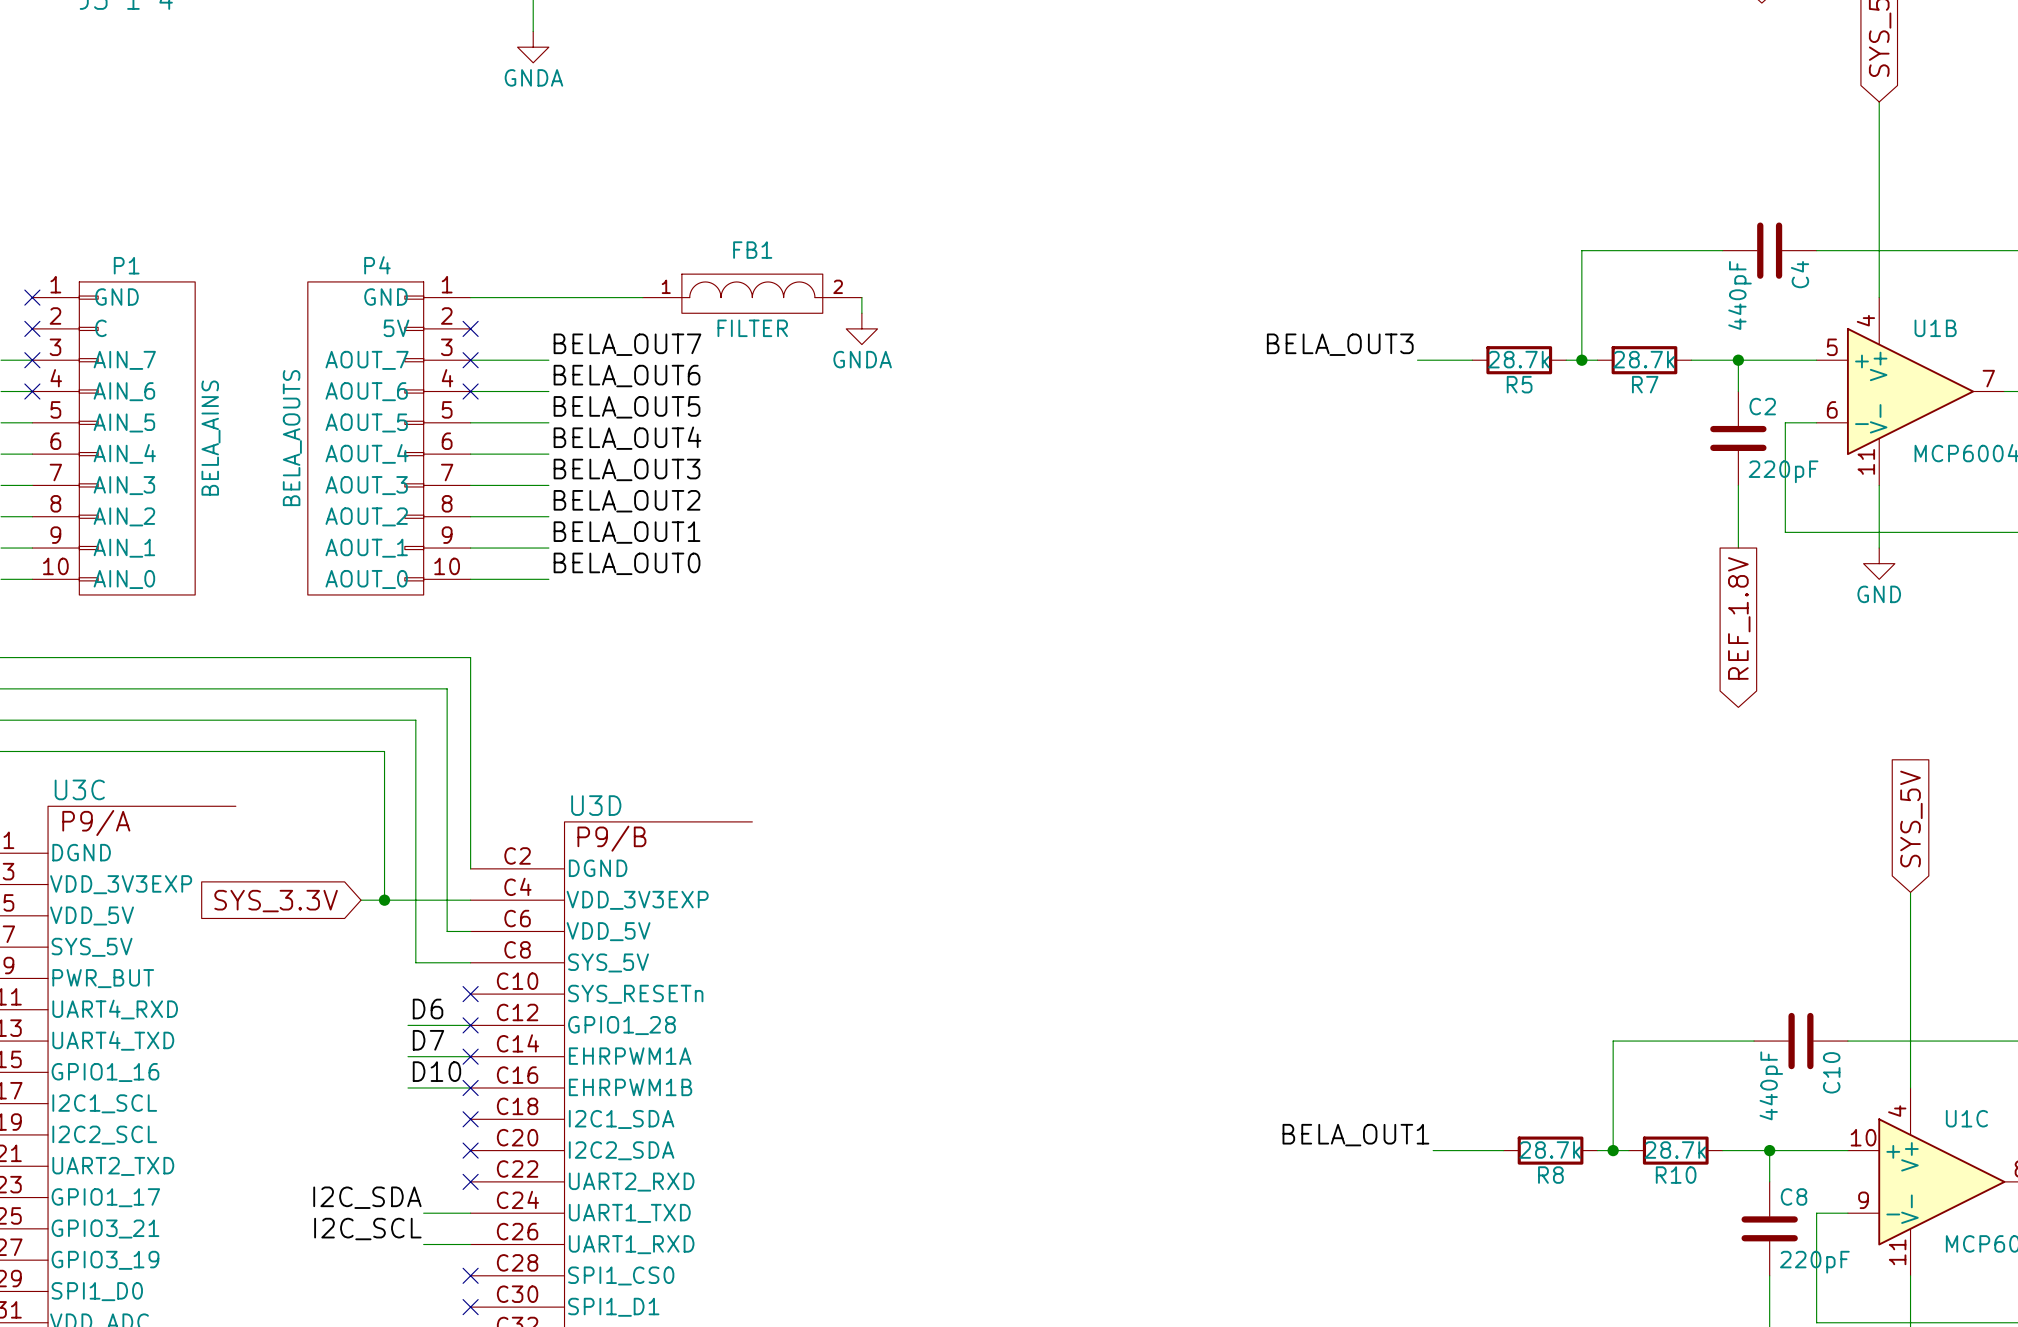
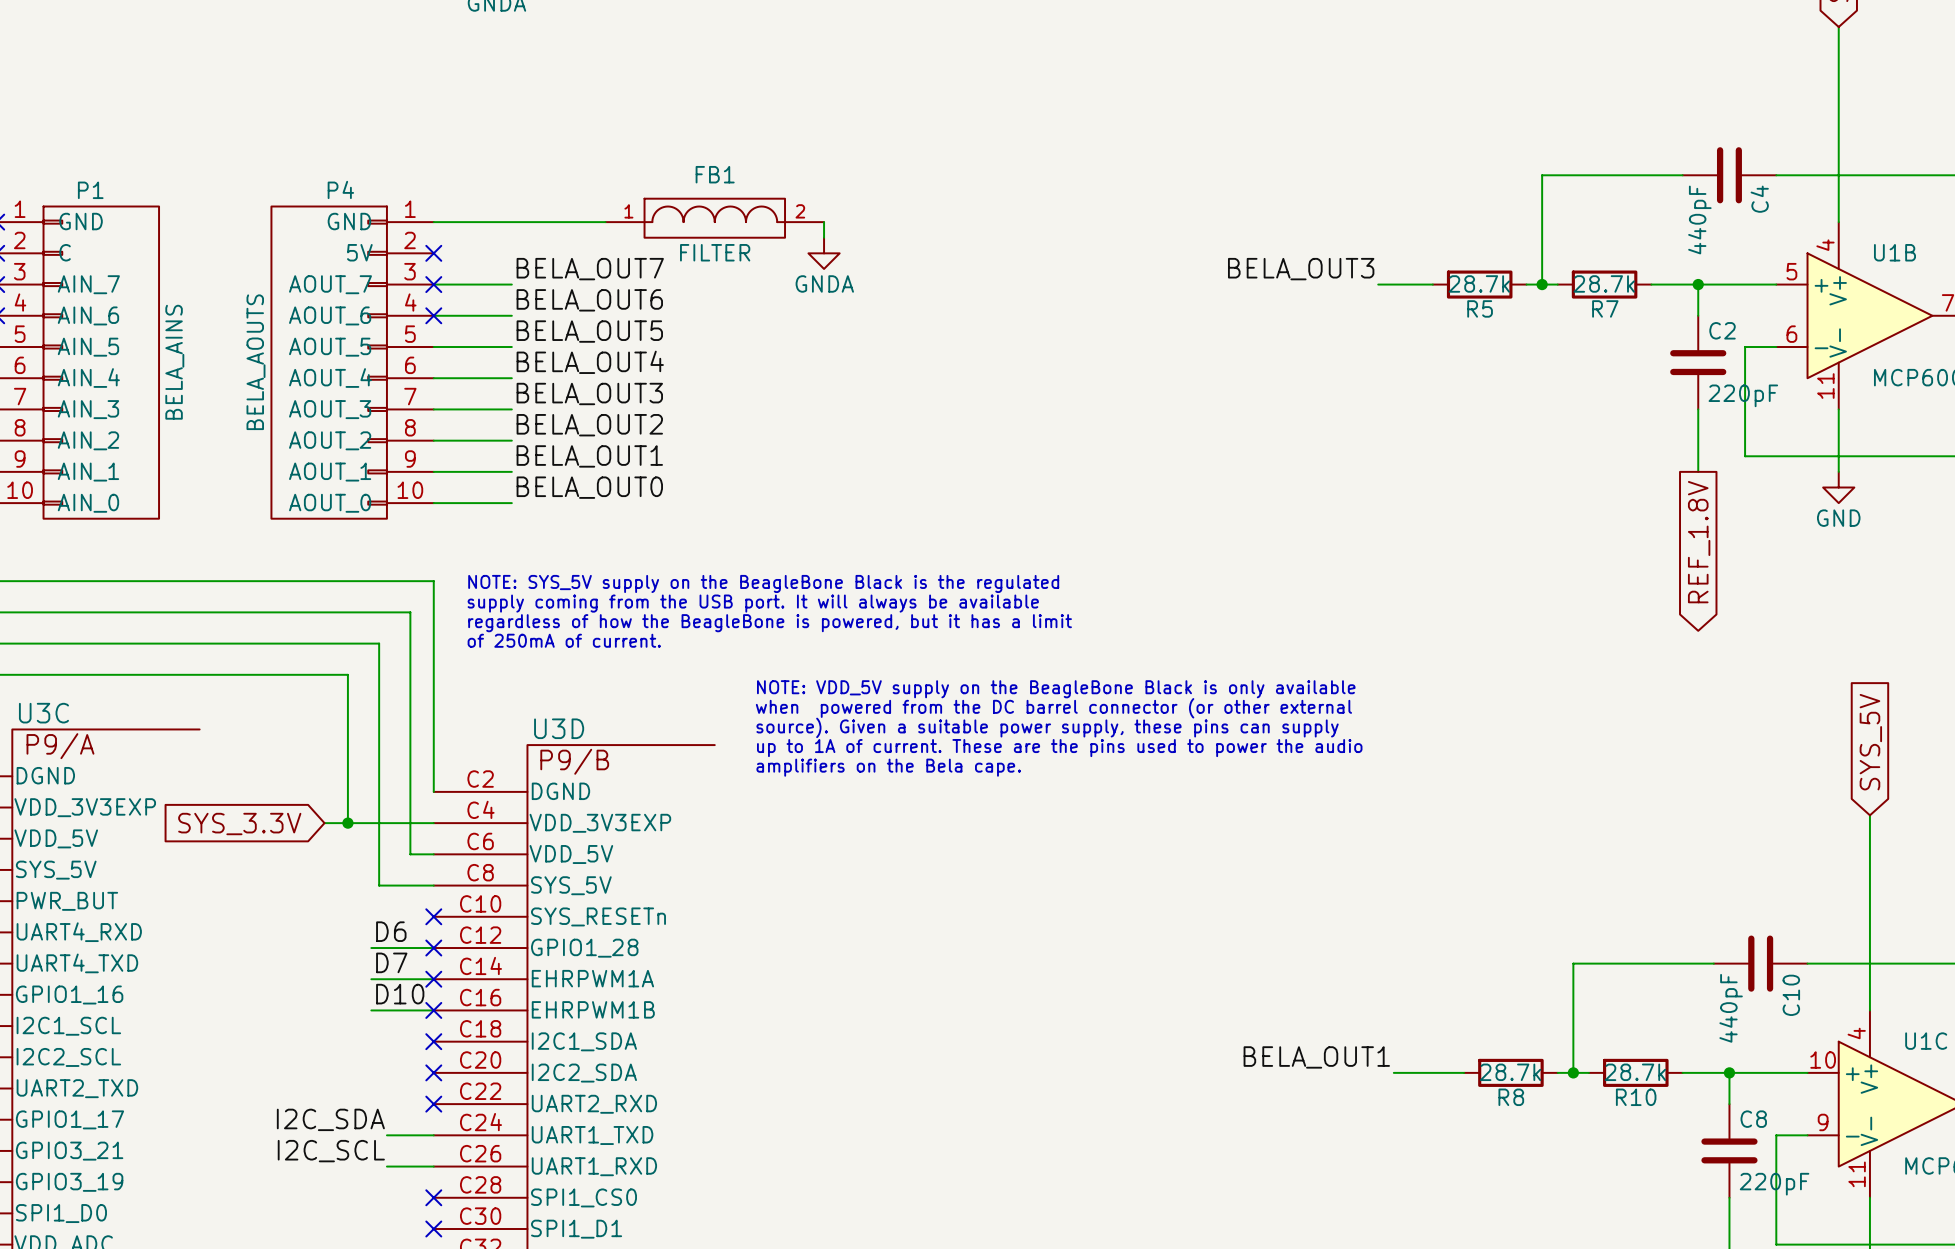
text: none -> NOTE: SYS_5V supply on the BeagleBone Black is the regulated (763, 583)
text: none -> supply coming from the USB port. It will always be available (753, 603)
text: none -> regardless of how the BeagleBone is powered, but it has a limit (770, 623)
text: none -> of 250mA of current. (564, 640)
text: none -> NOTE: VDD_5V supply on the BeagleBone Black is only available (1056, 689)
text: none -> when powered from the DC barrel connector (or other external (1053, 708)
text: none -> source). Given a suitable power supply, these pins can supply (1047, 727)
text: none -> up to 1A of current. These are the pins used to power the audio (1059, 748)
text: none -> amplifiers on the Bela cape. (888, 767)

